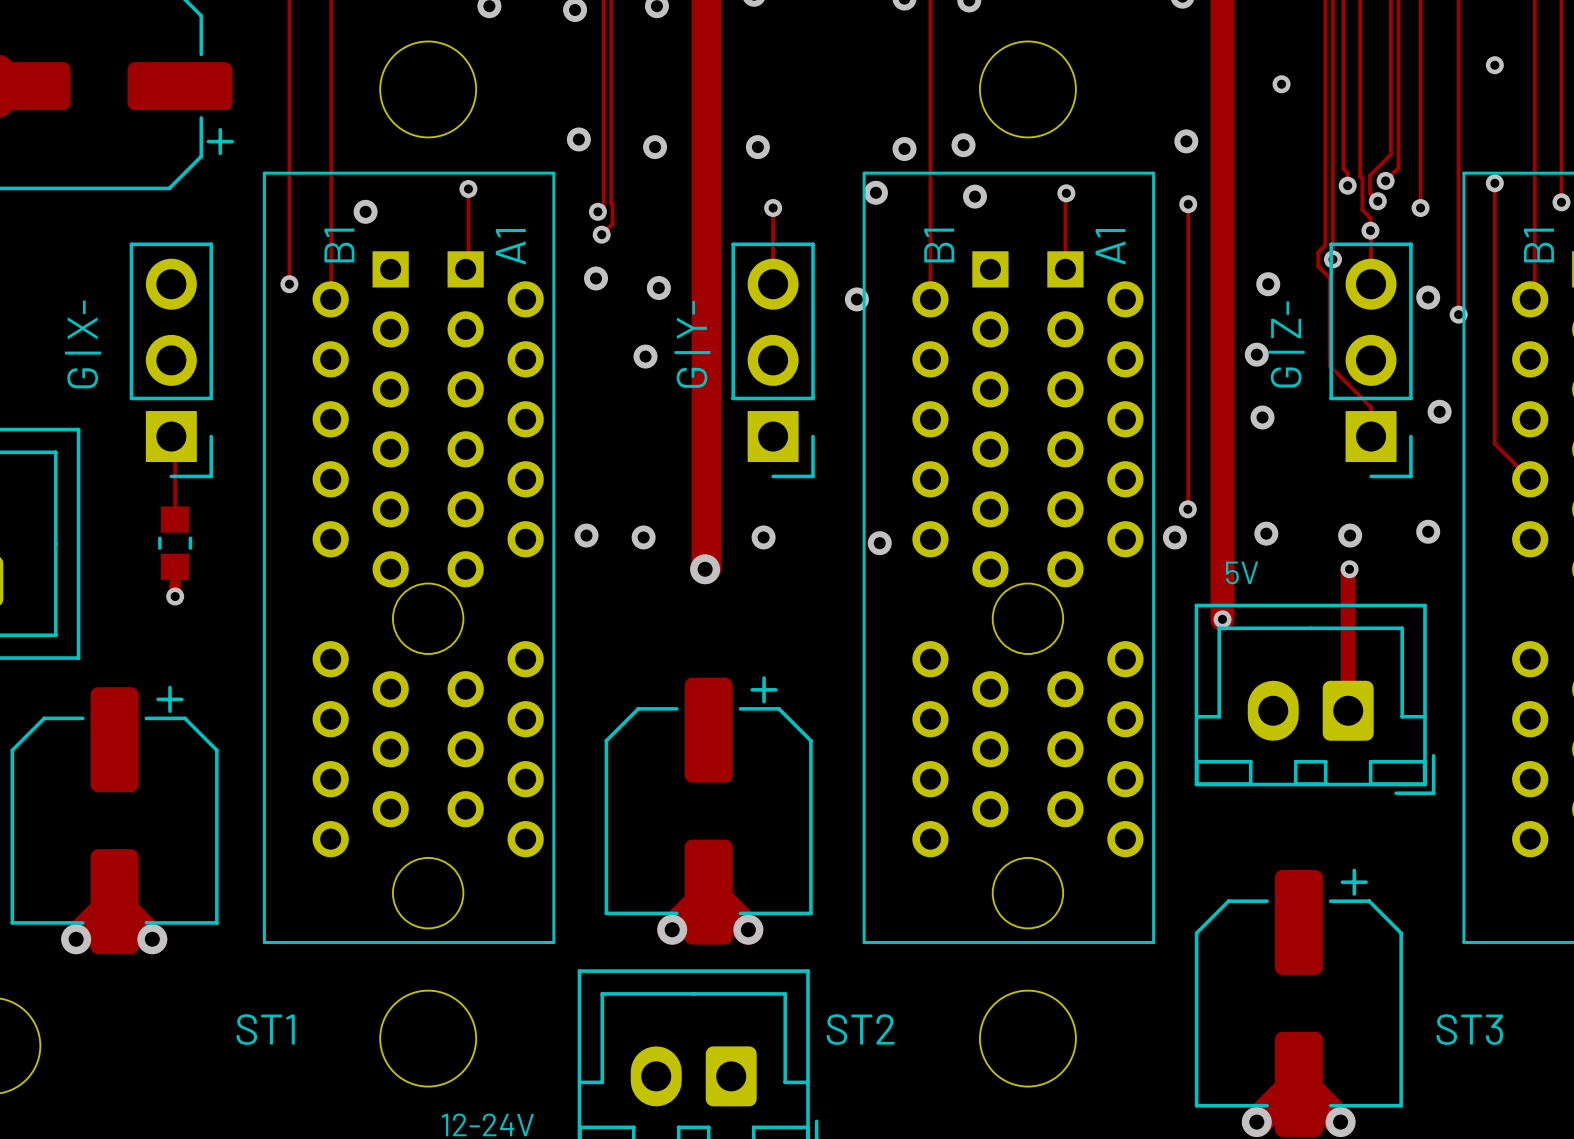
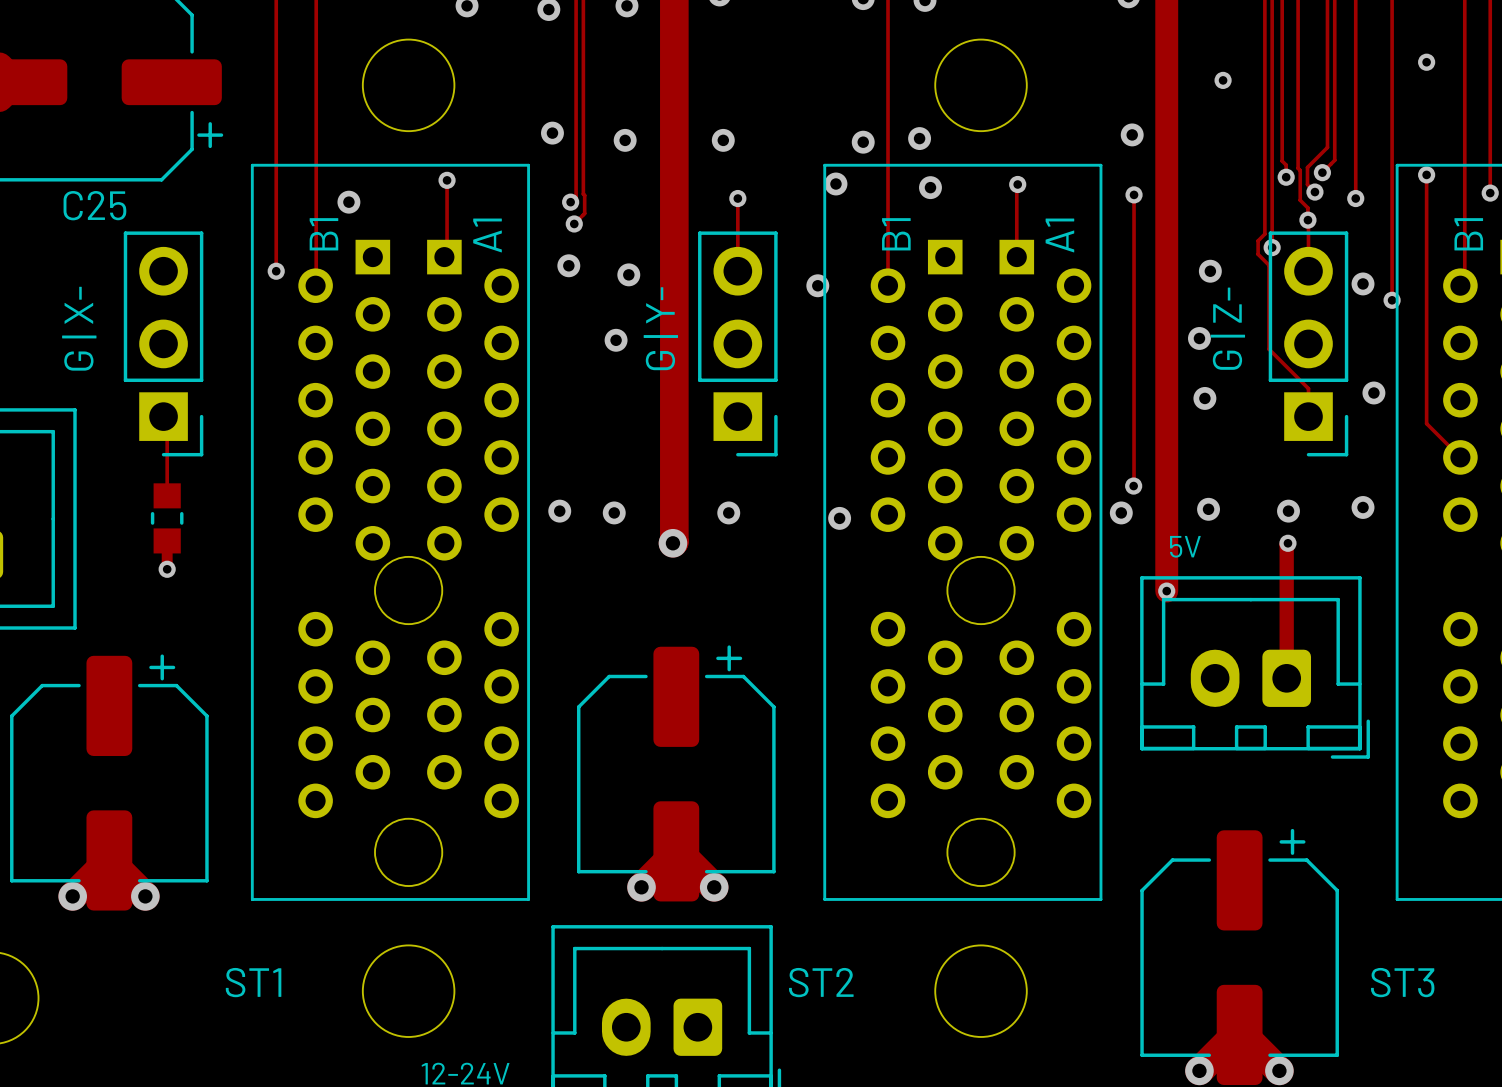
C25 name: none -> C25 (94, 205)

